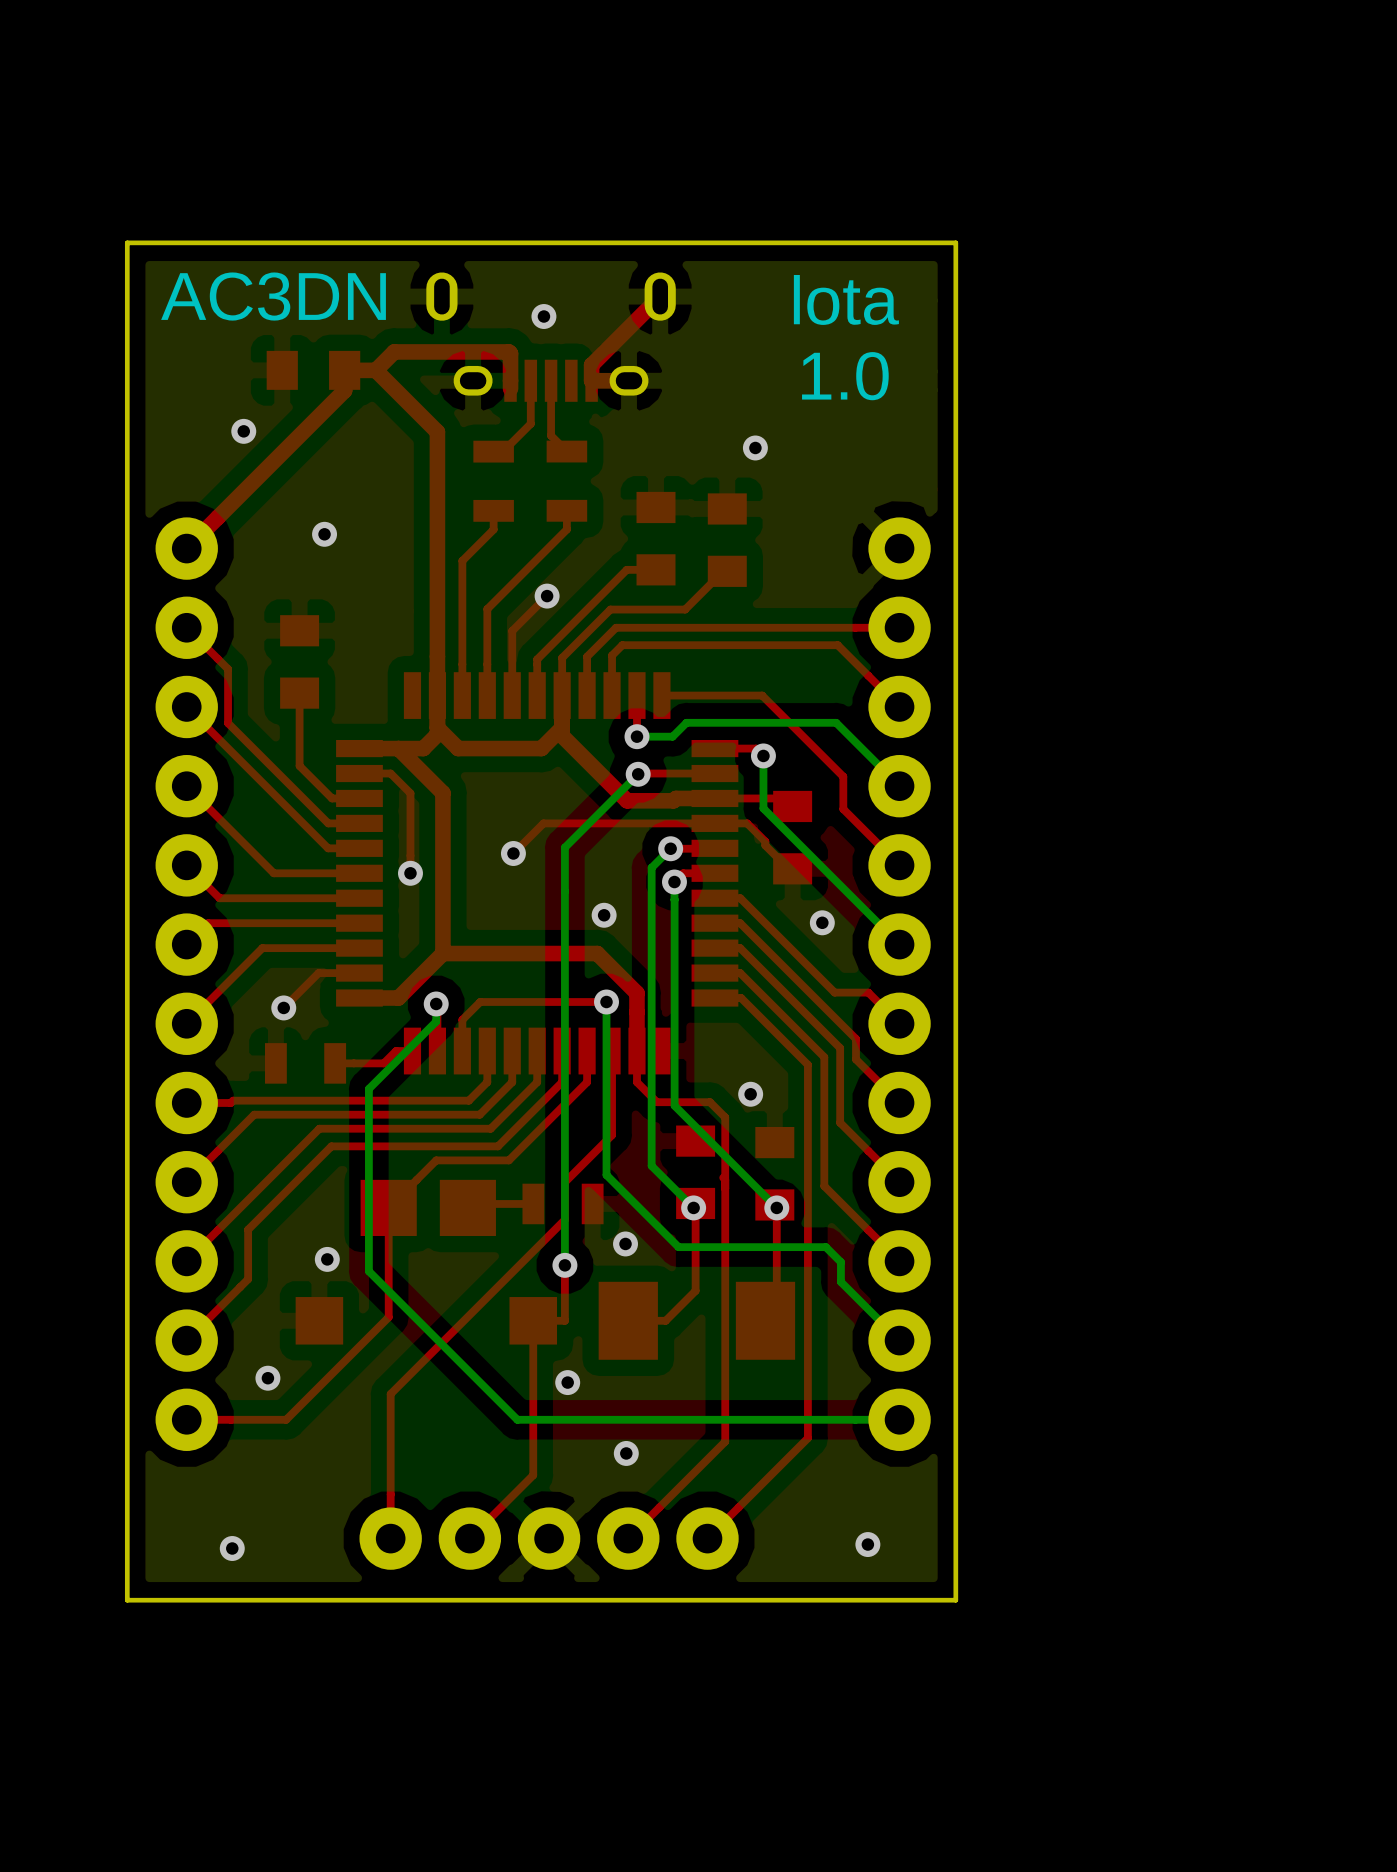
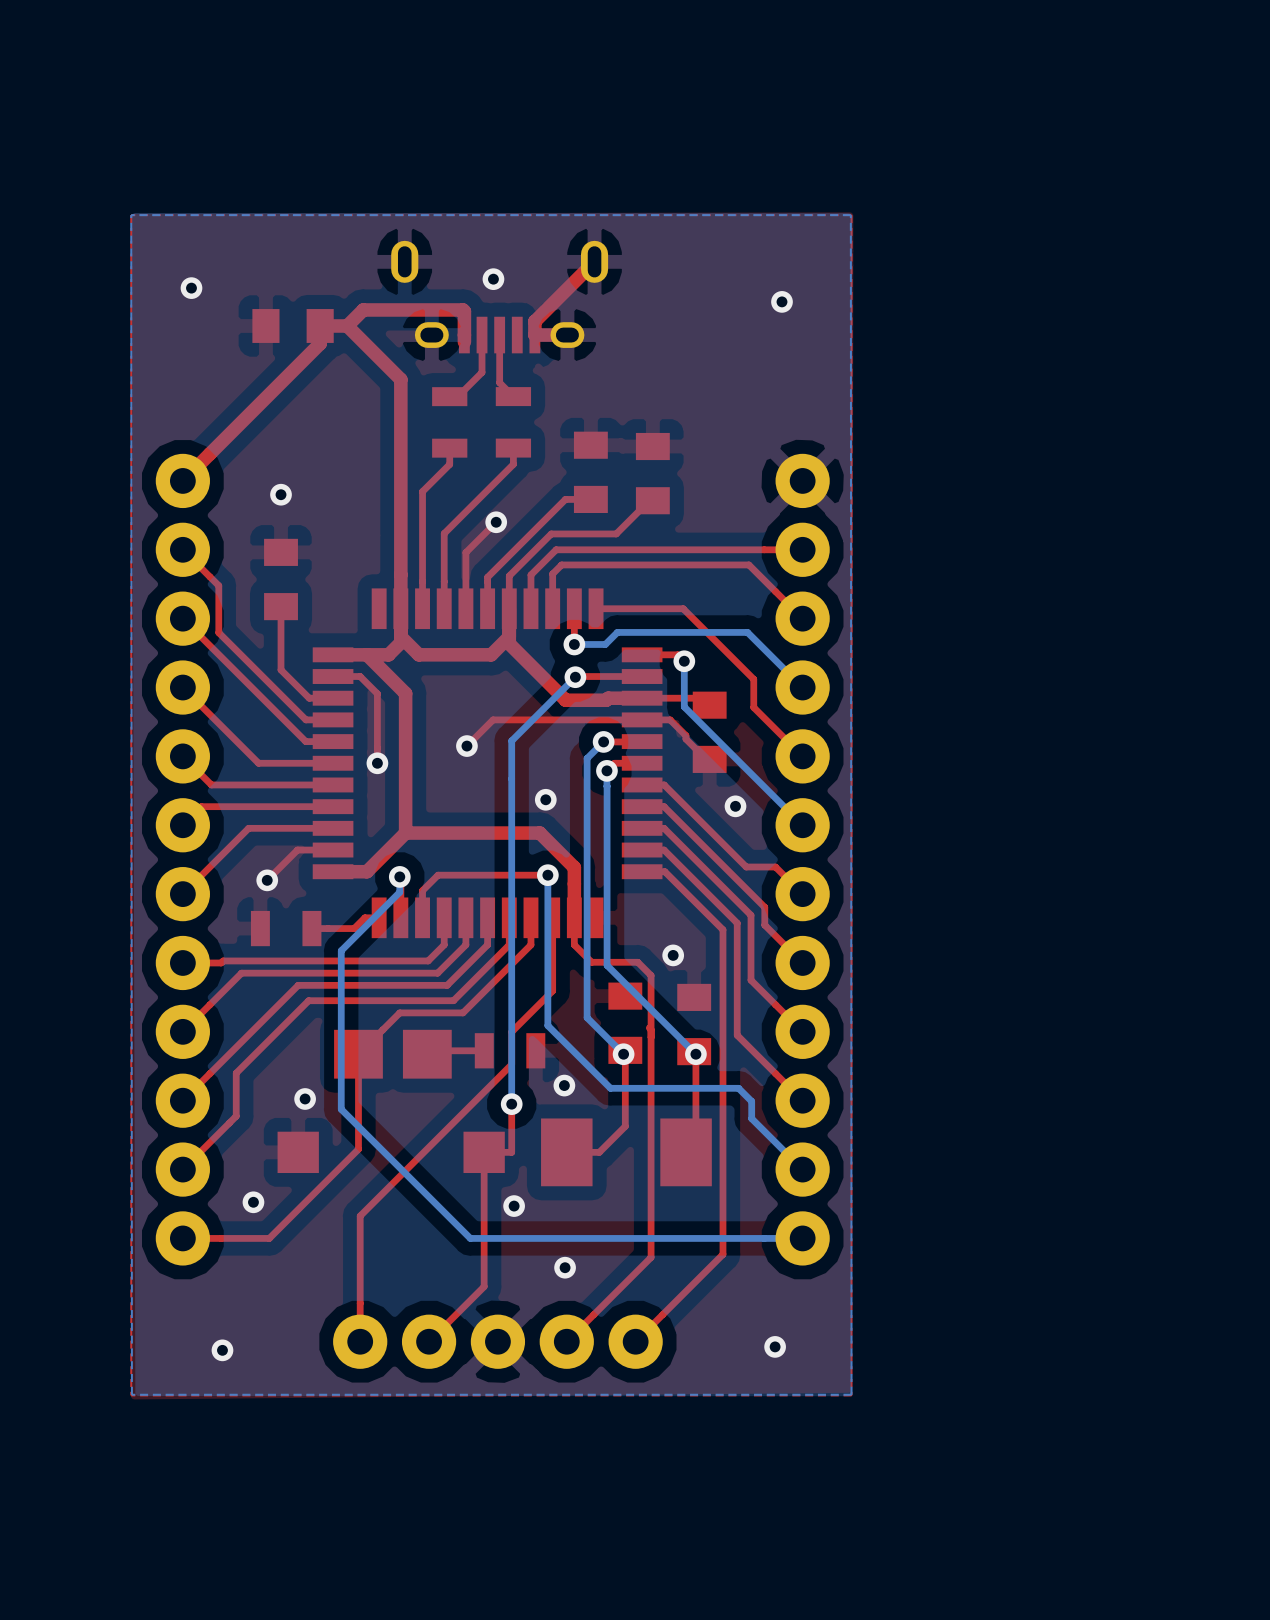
board edge: (955, 242) (955, 1600) (127, 1600) (127, 242) (955, 242) -> none
text: AC3DN (273, 296) -> none
text: Ɩota (846, 299) -> none
via: none -> (191, 288)
text: 1.0 (845, 376) -> none
via: (243, 431) -> none
via position: (755, 447) -> (781, 301)
via position: (324, 534) -> (281, 494)

